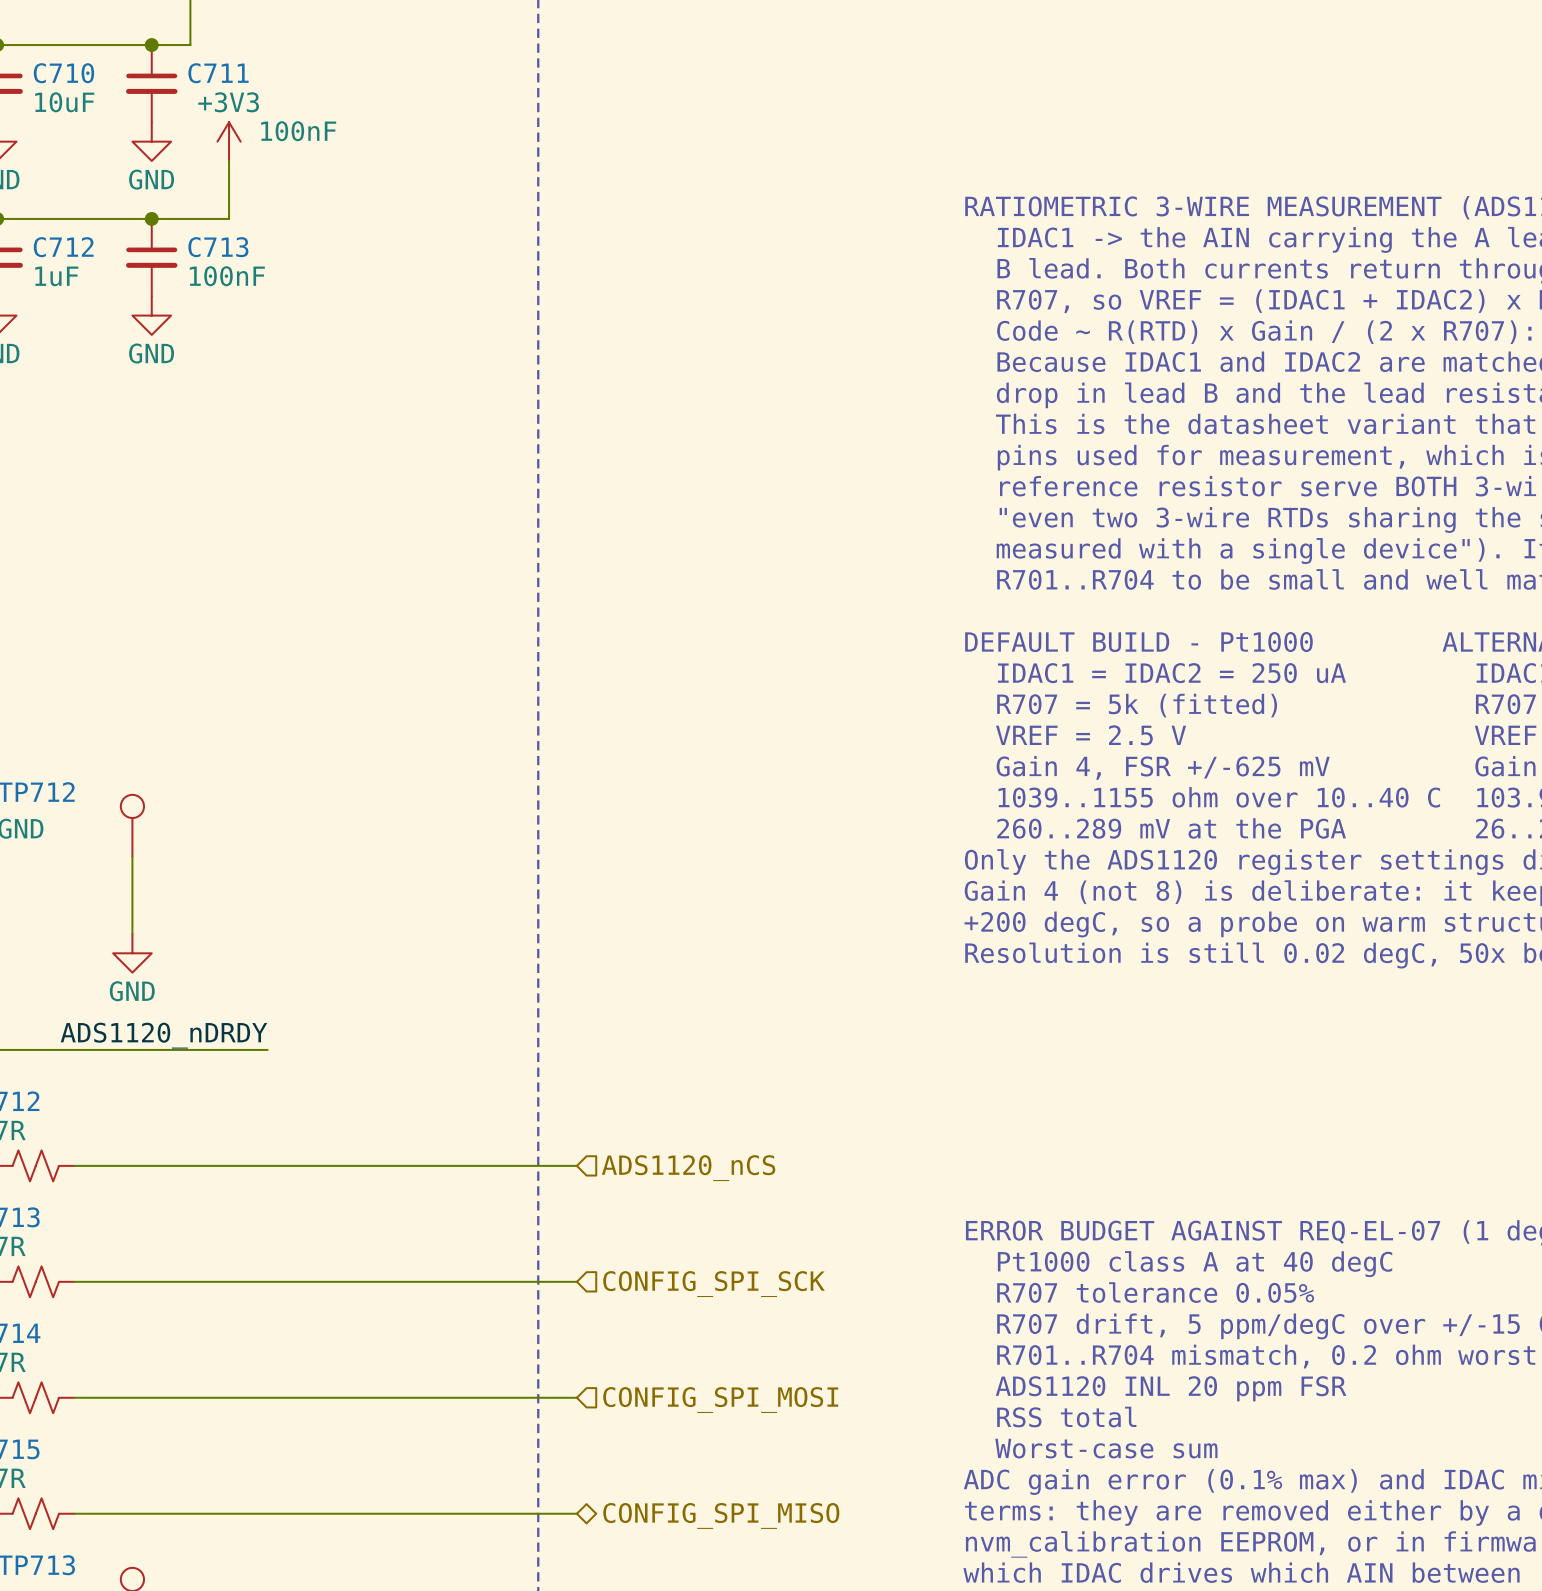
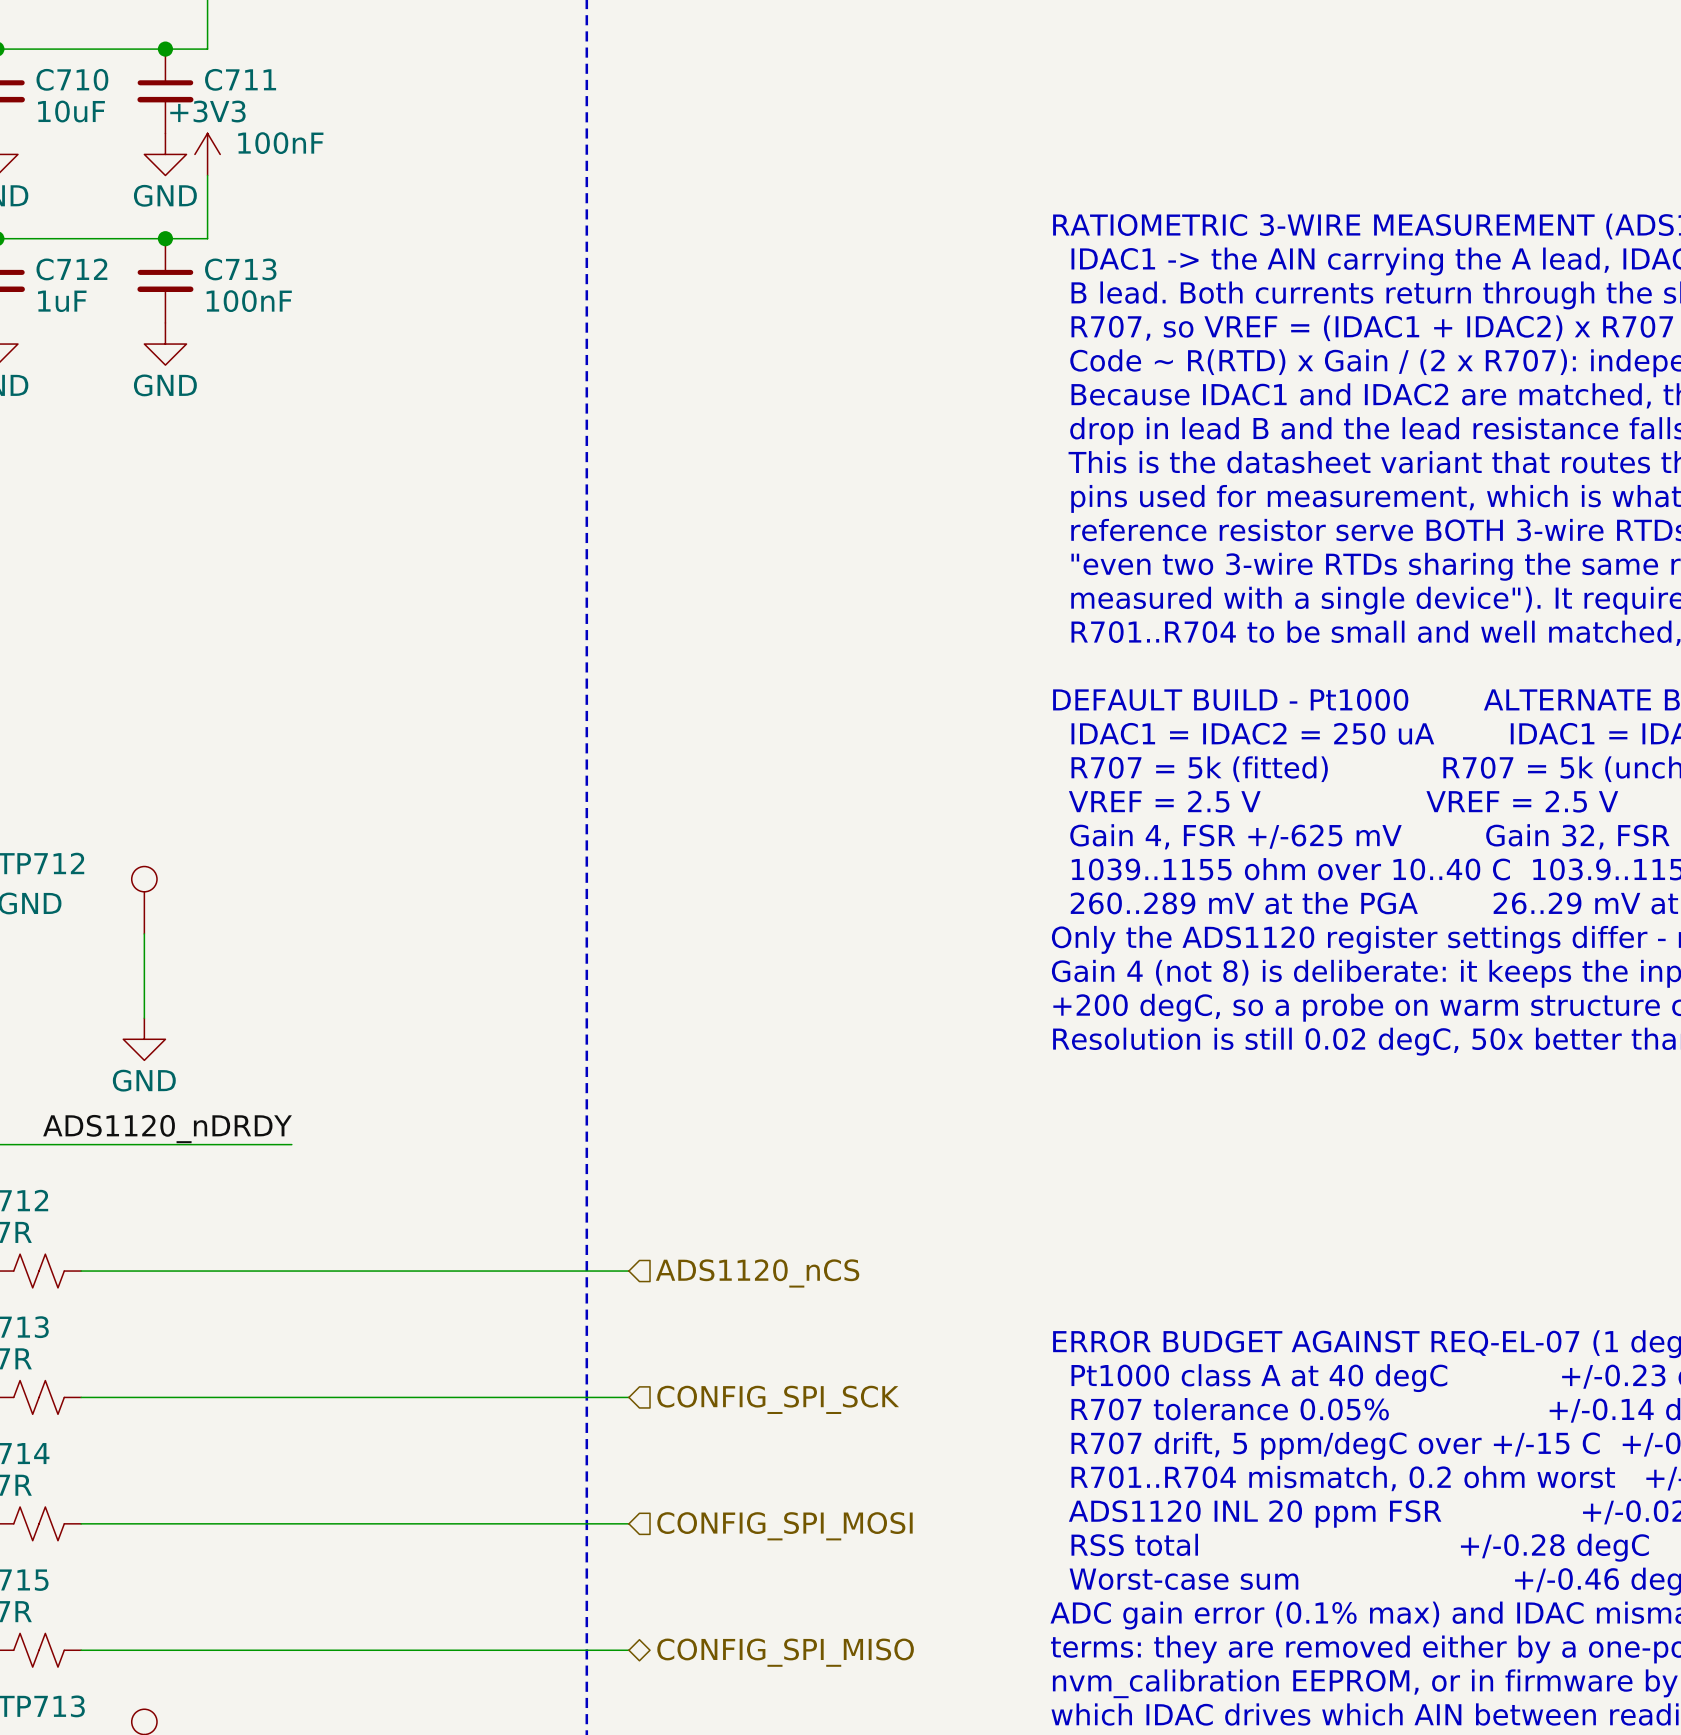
C711 value position: 100nF (298, 131) -> 100nF (280, 143)
power symbol position: +3V3 (229, 141) -> +3V3 (207, 154)
wire: (229, 160) (229, 218) (190, 218) -> (207, 175) (207, 238)

